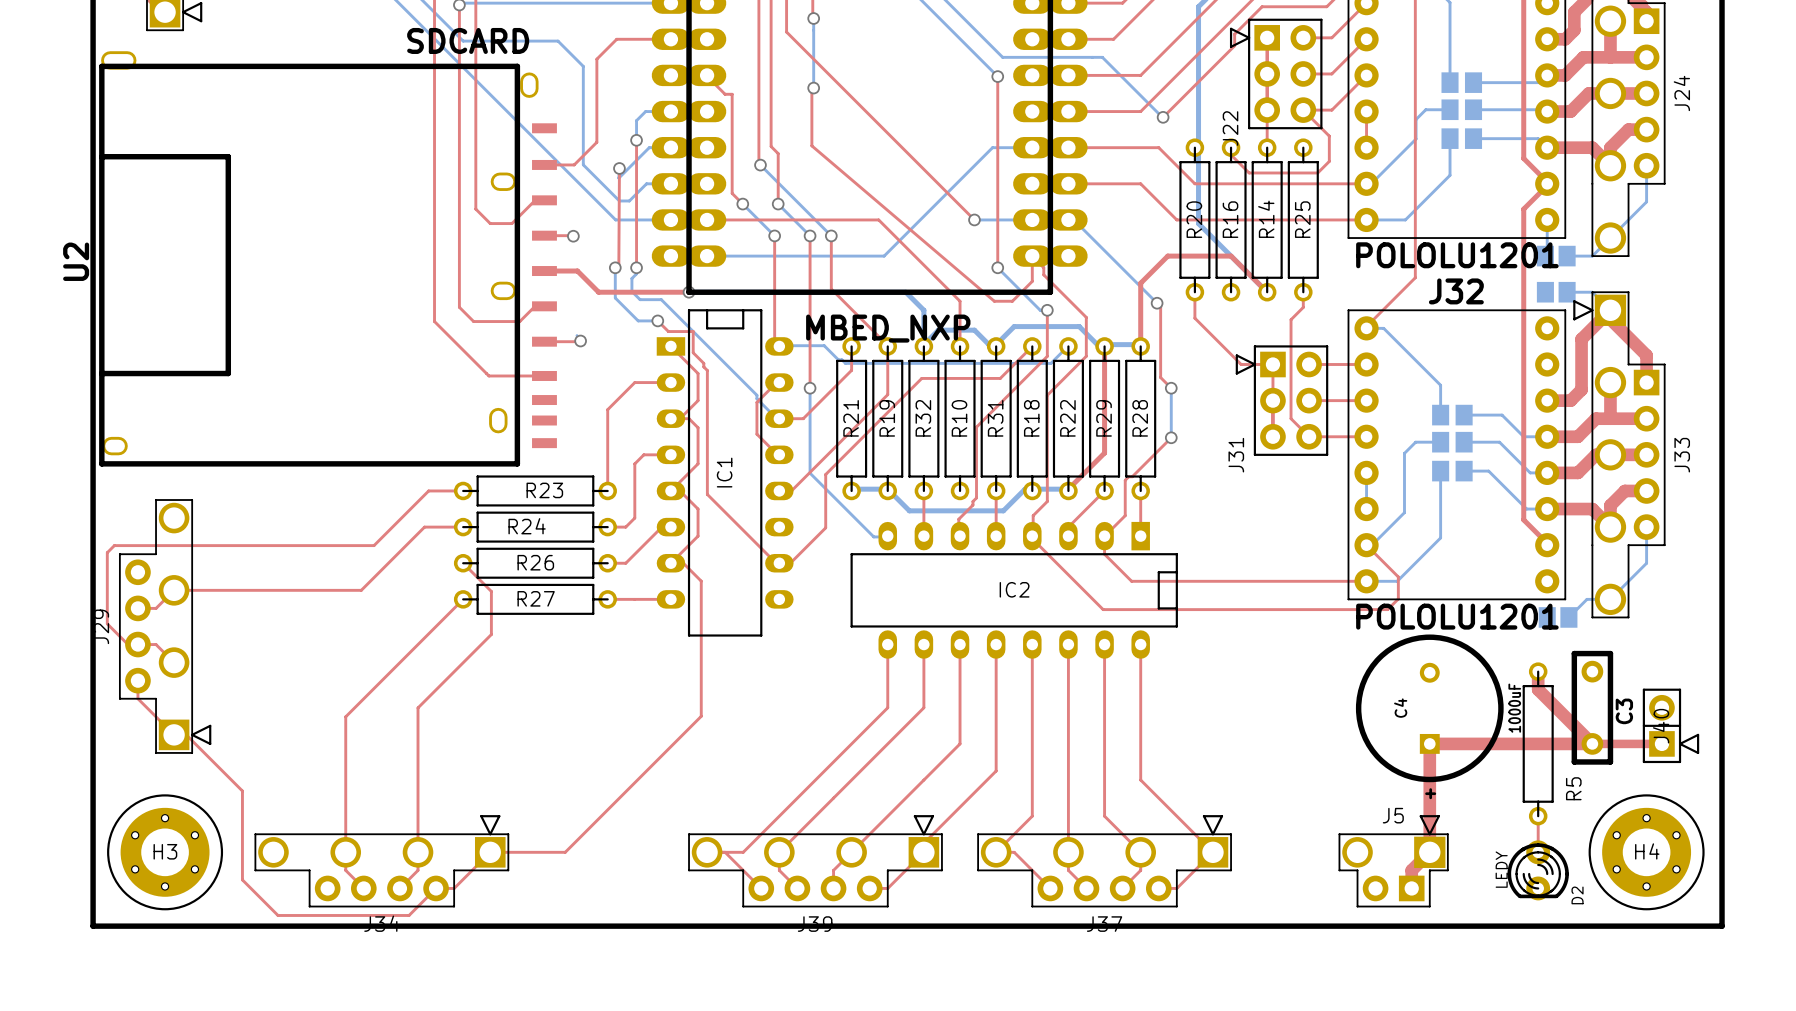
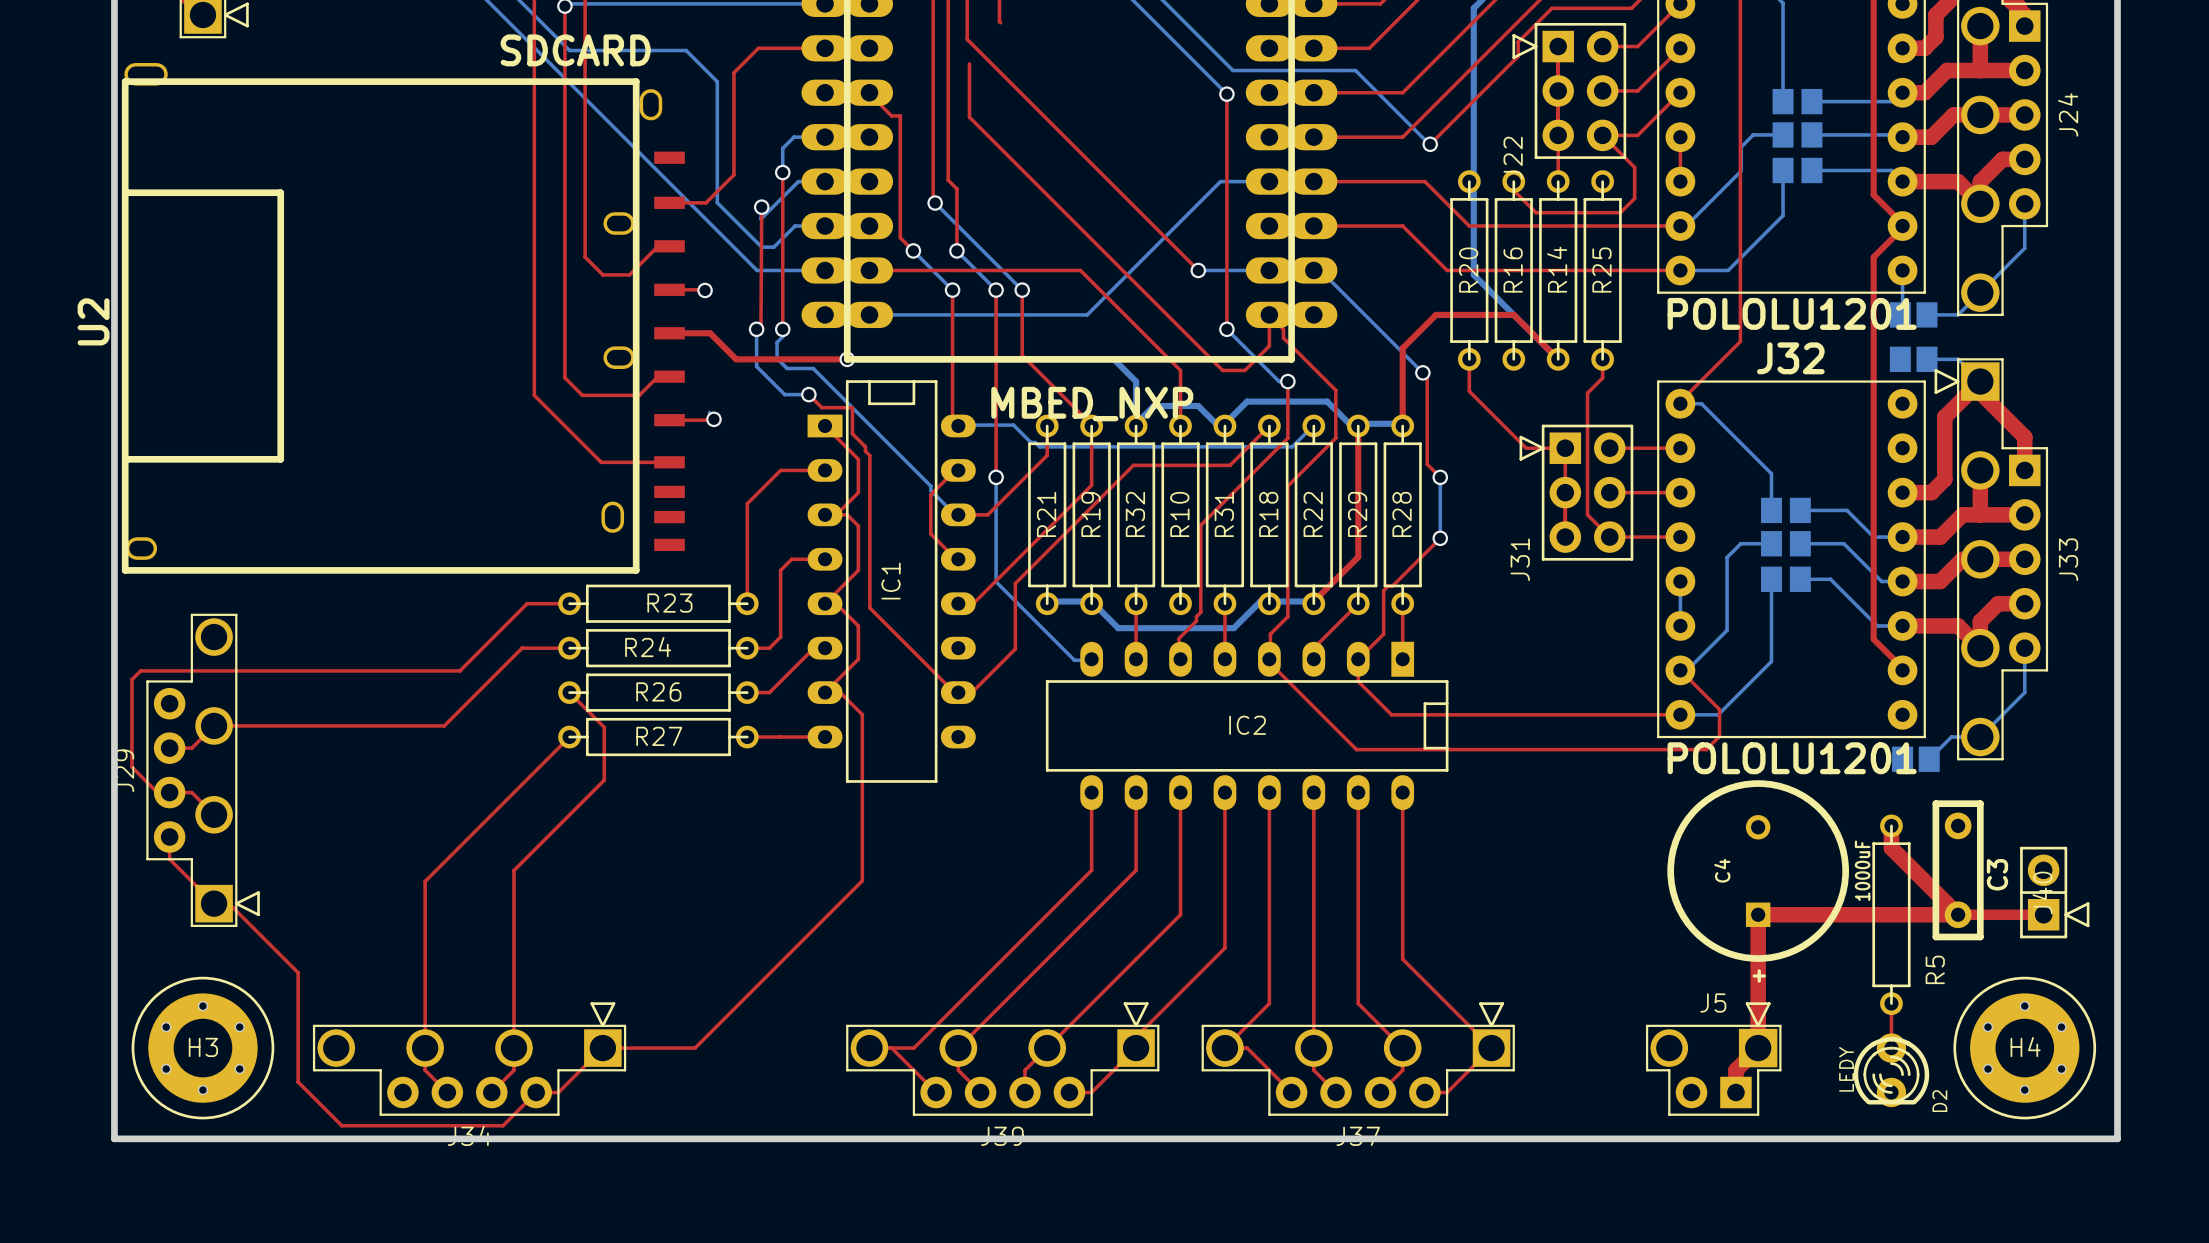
bottom track: (813, 18) (813, 88) -> none
via: (813, 18) -> none
top track: (813, 88) (811, 89) (811, 145) (994, 301) -> (969, 63) (969, 117) (1222, 370)
via: (813, 88) -> none

